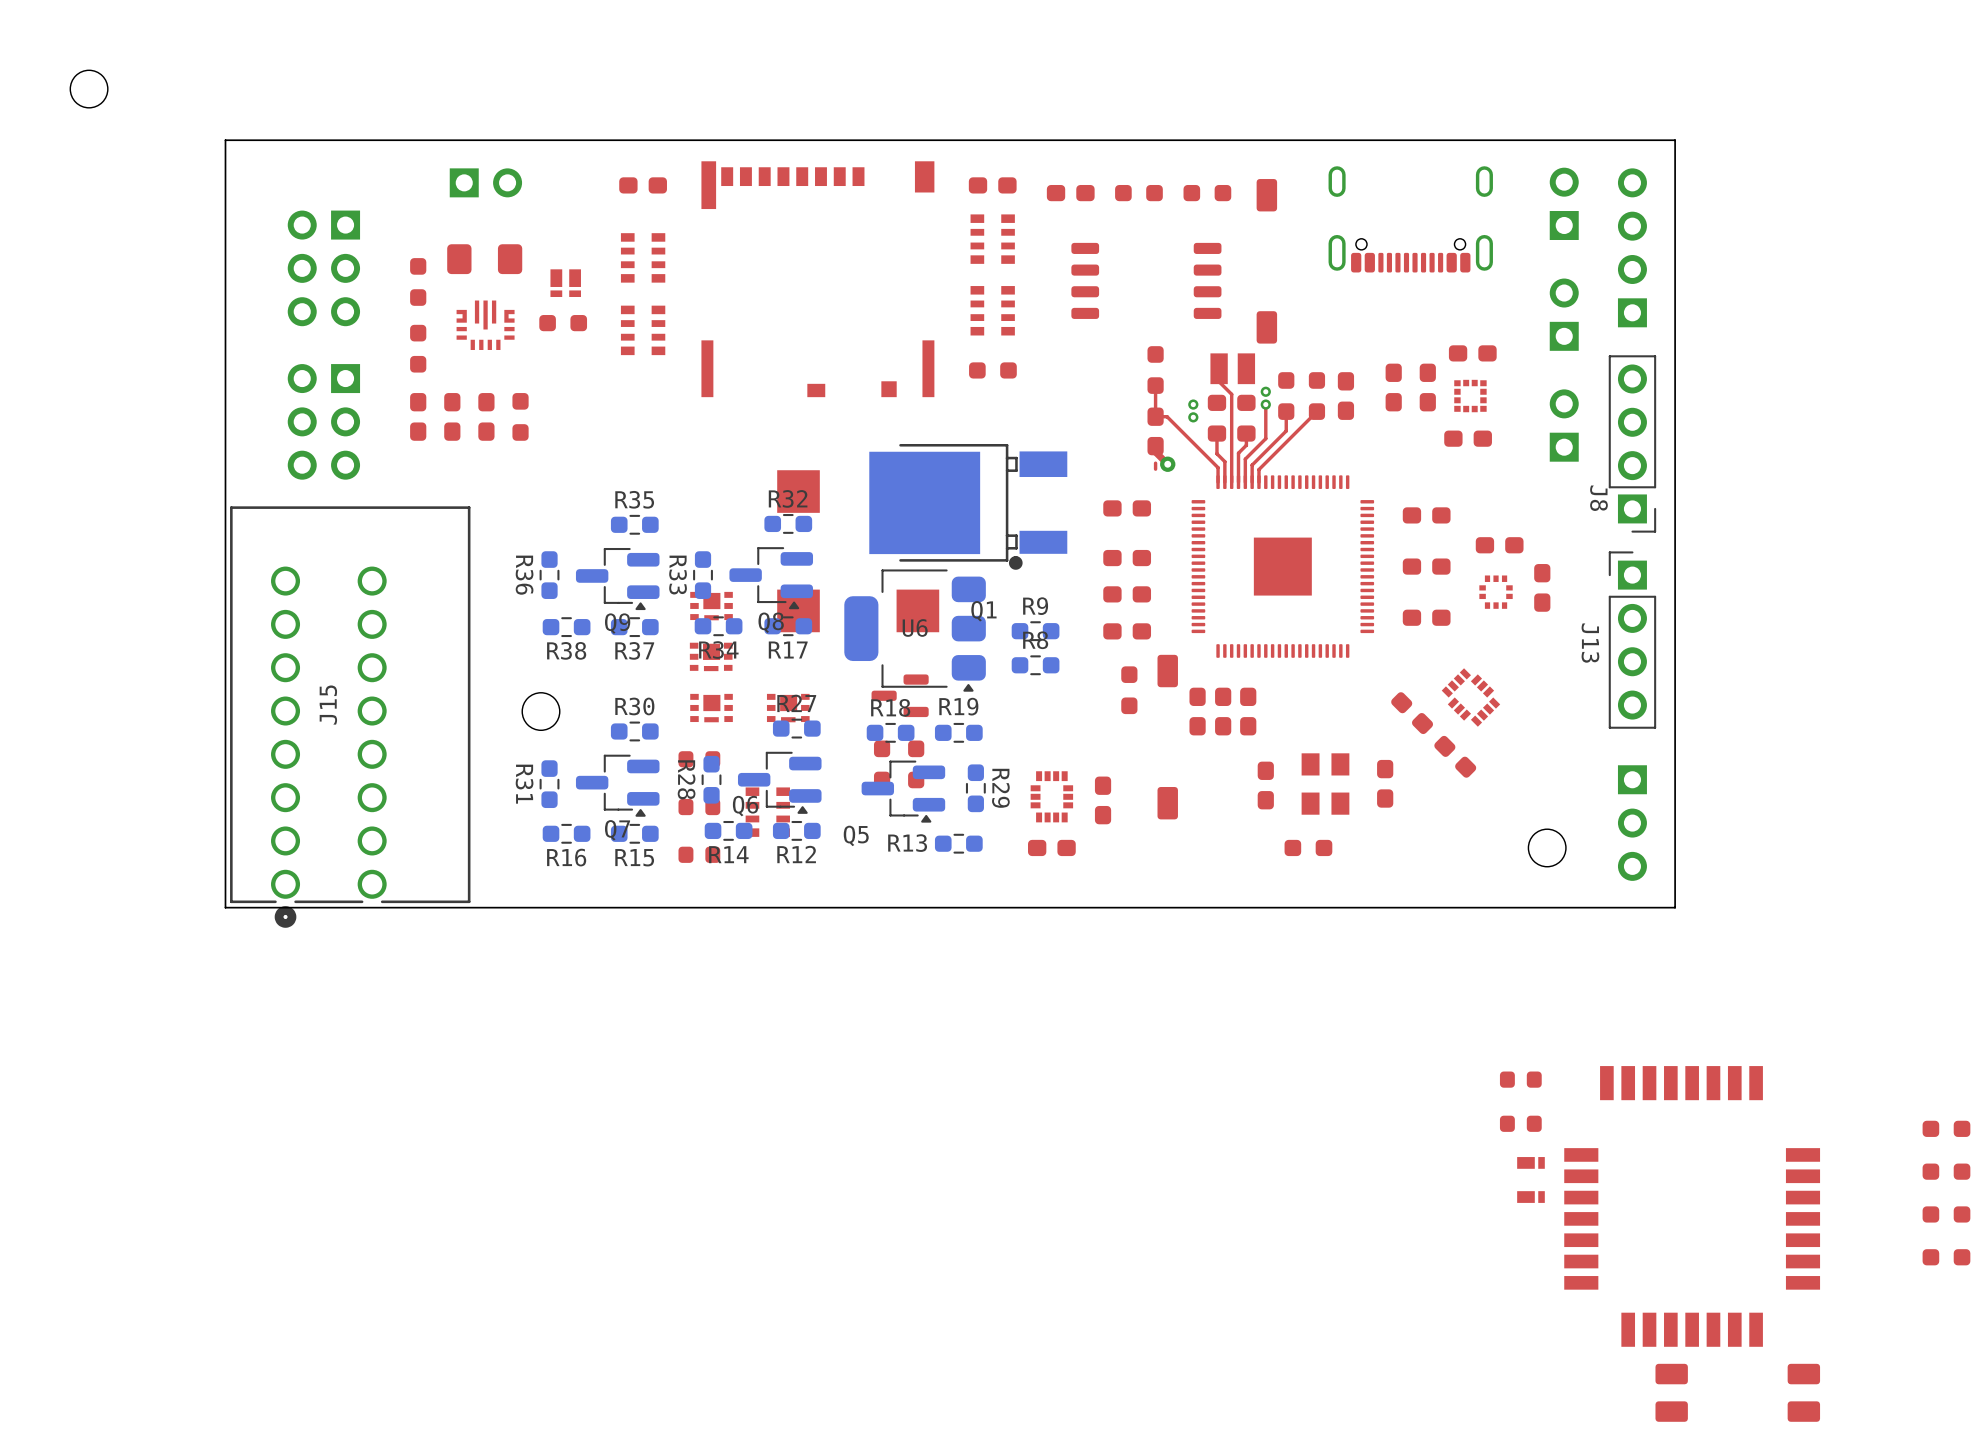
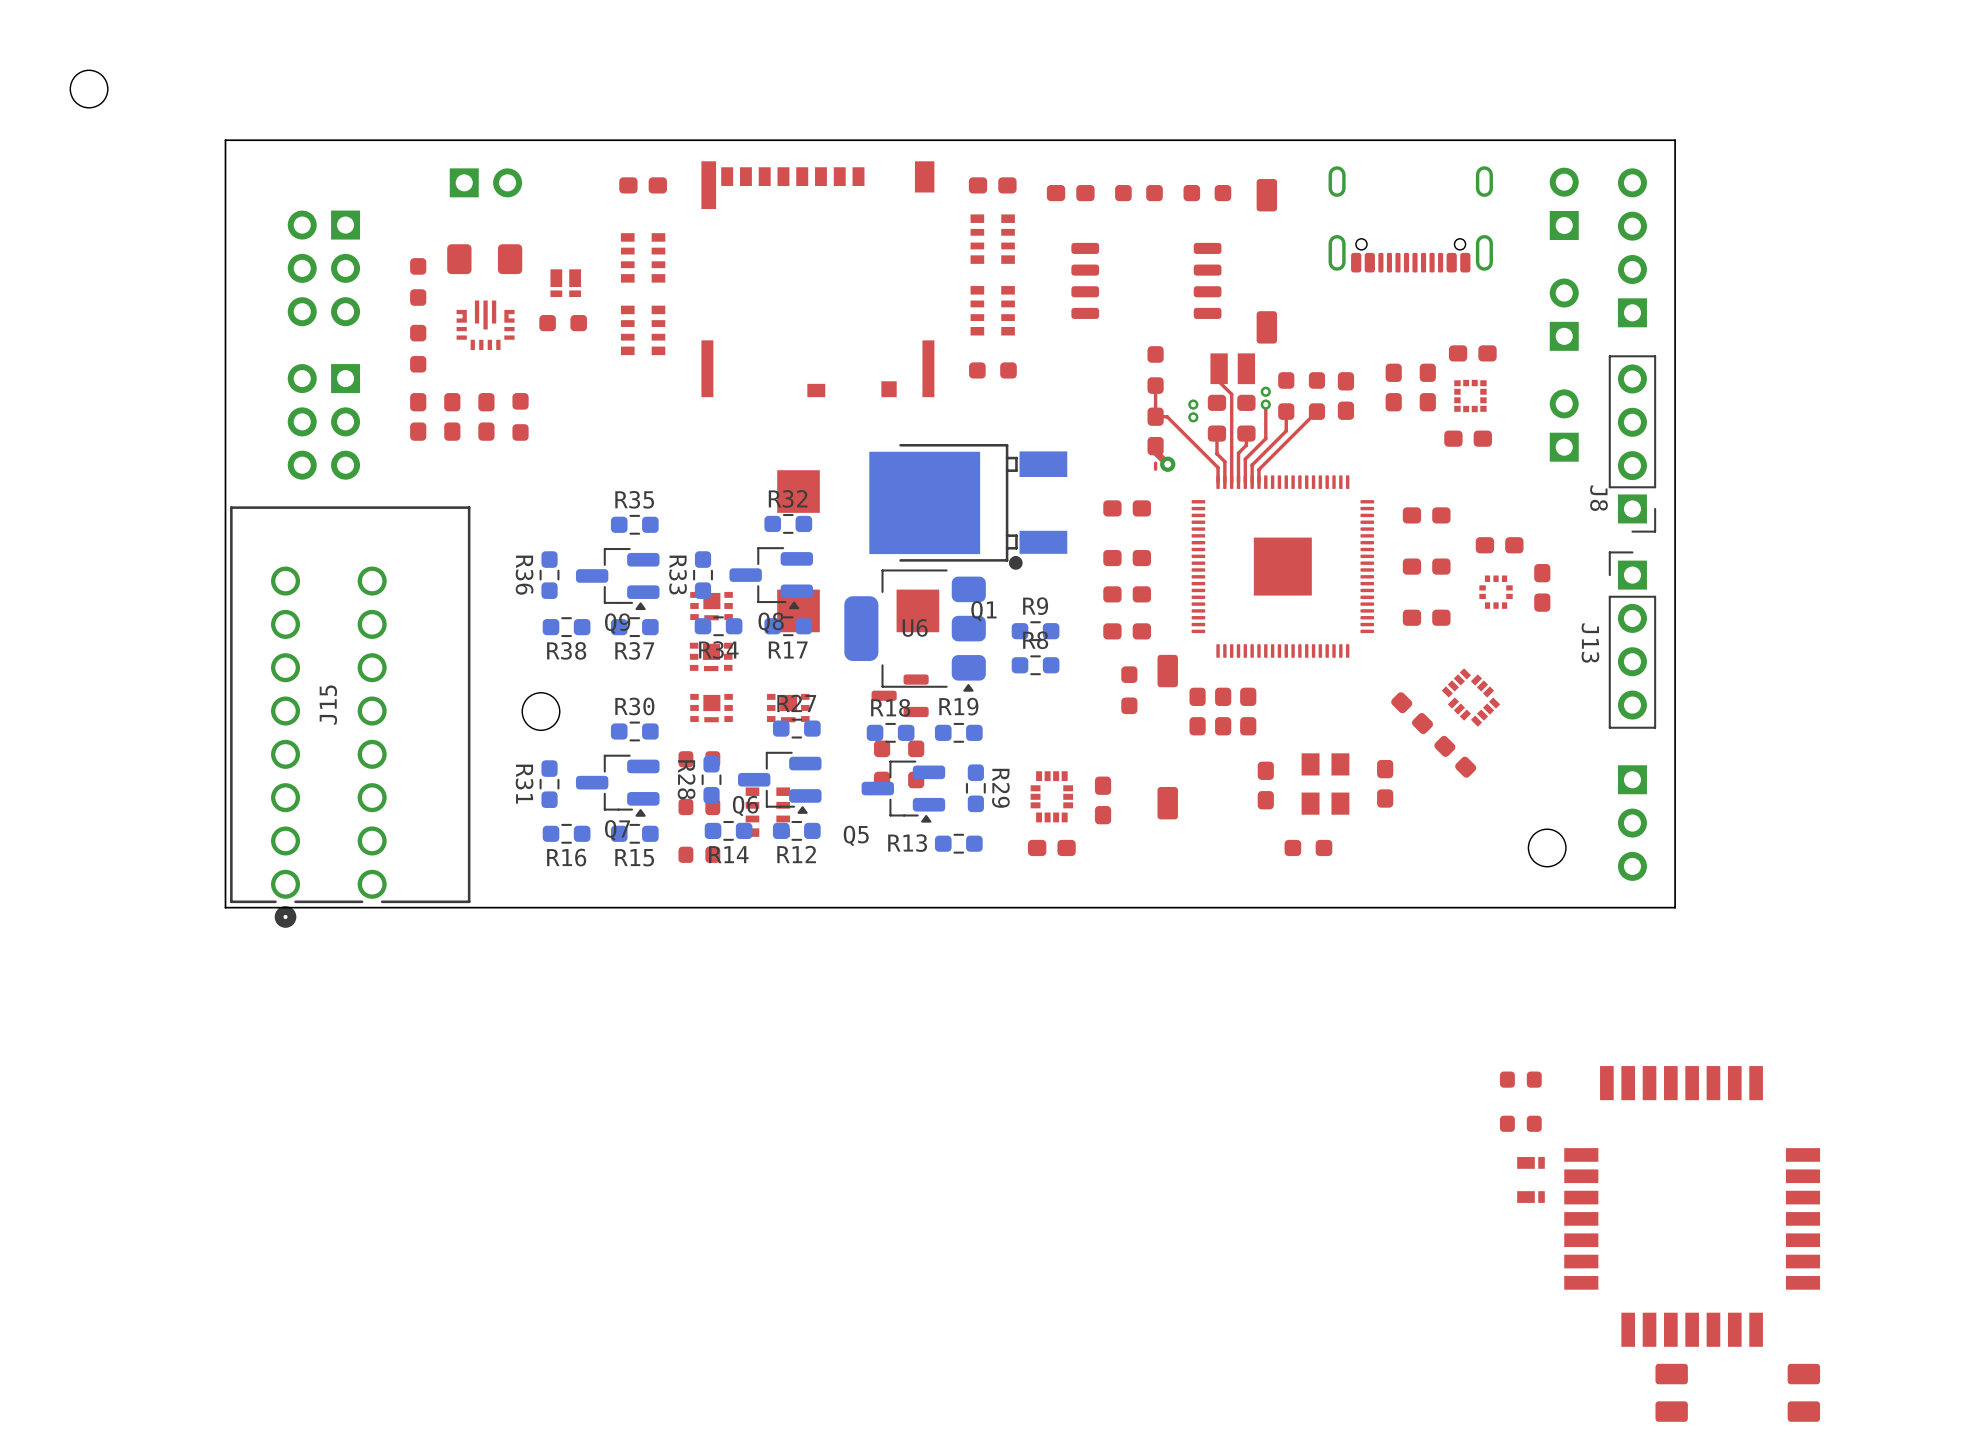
part: (1946, 1128) -> none
part: (1946, 1171) -> none
part: (1946, 1214) -> none
part: (1946, 1257) -> none

